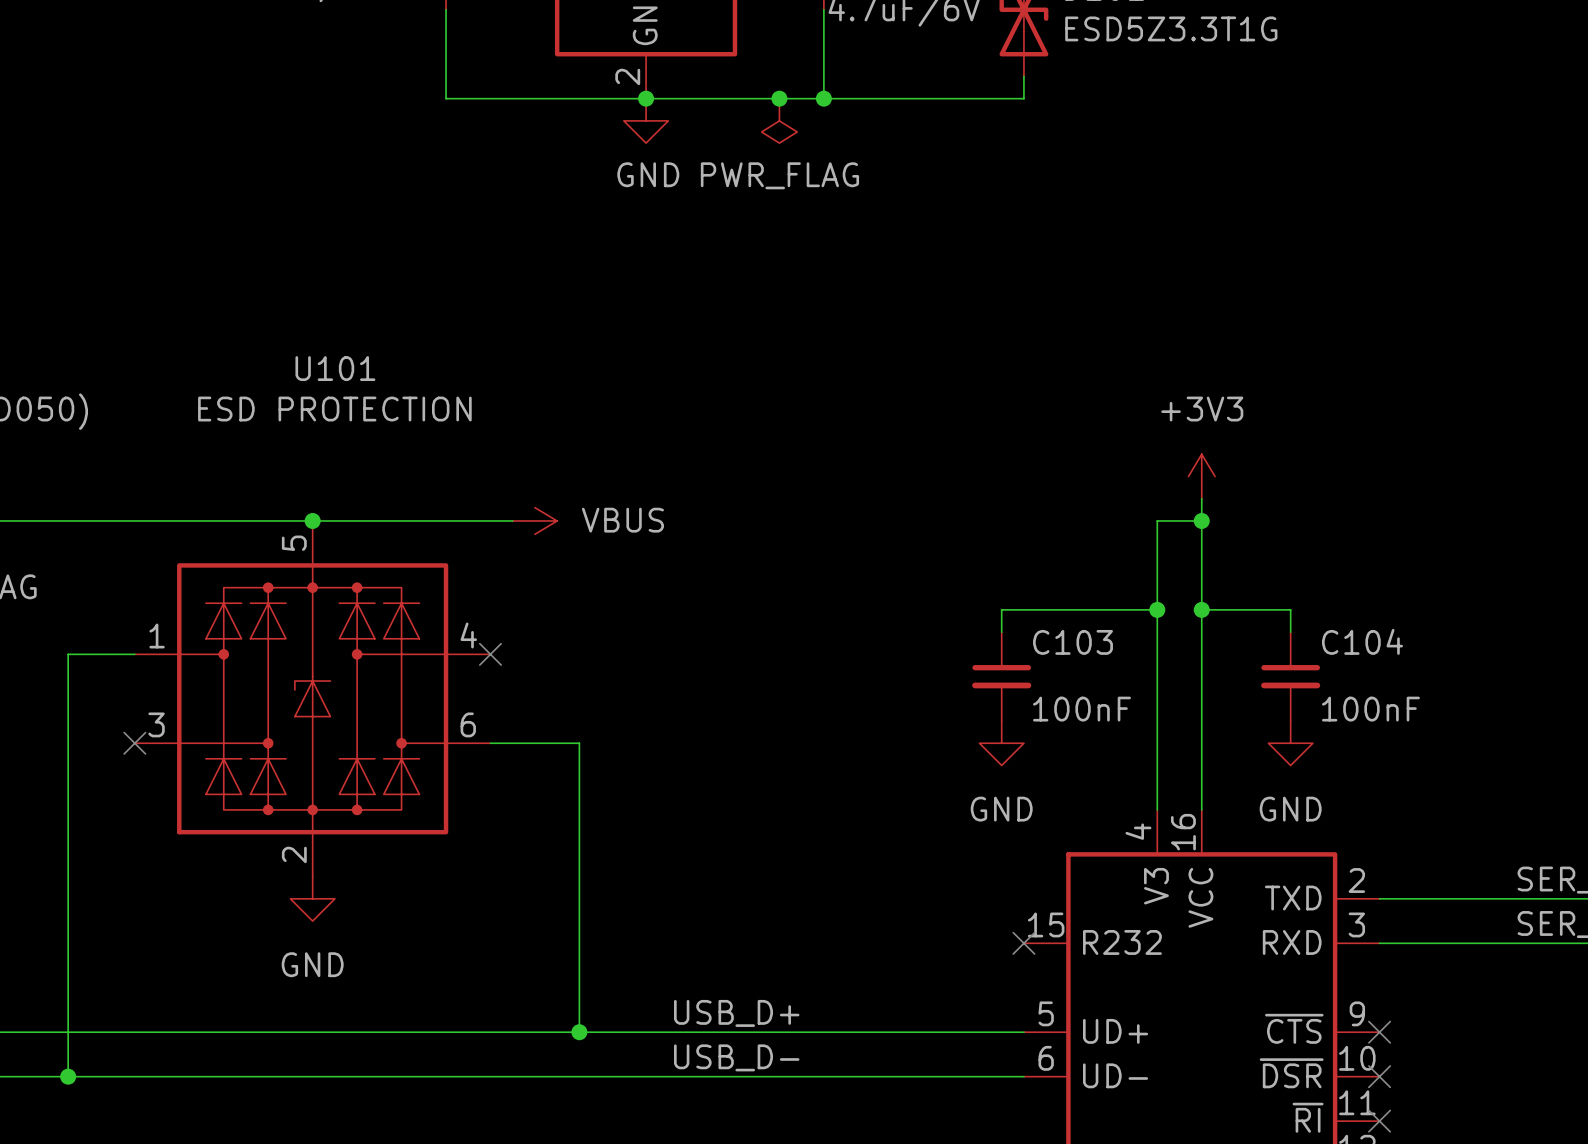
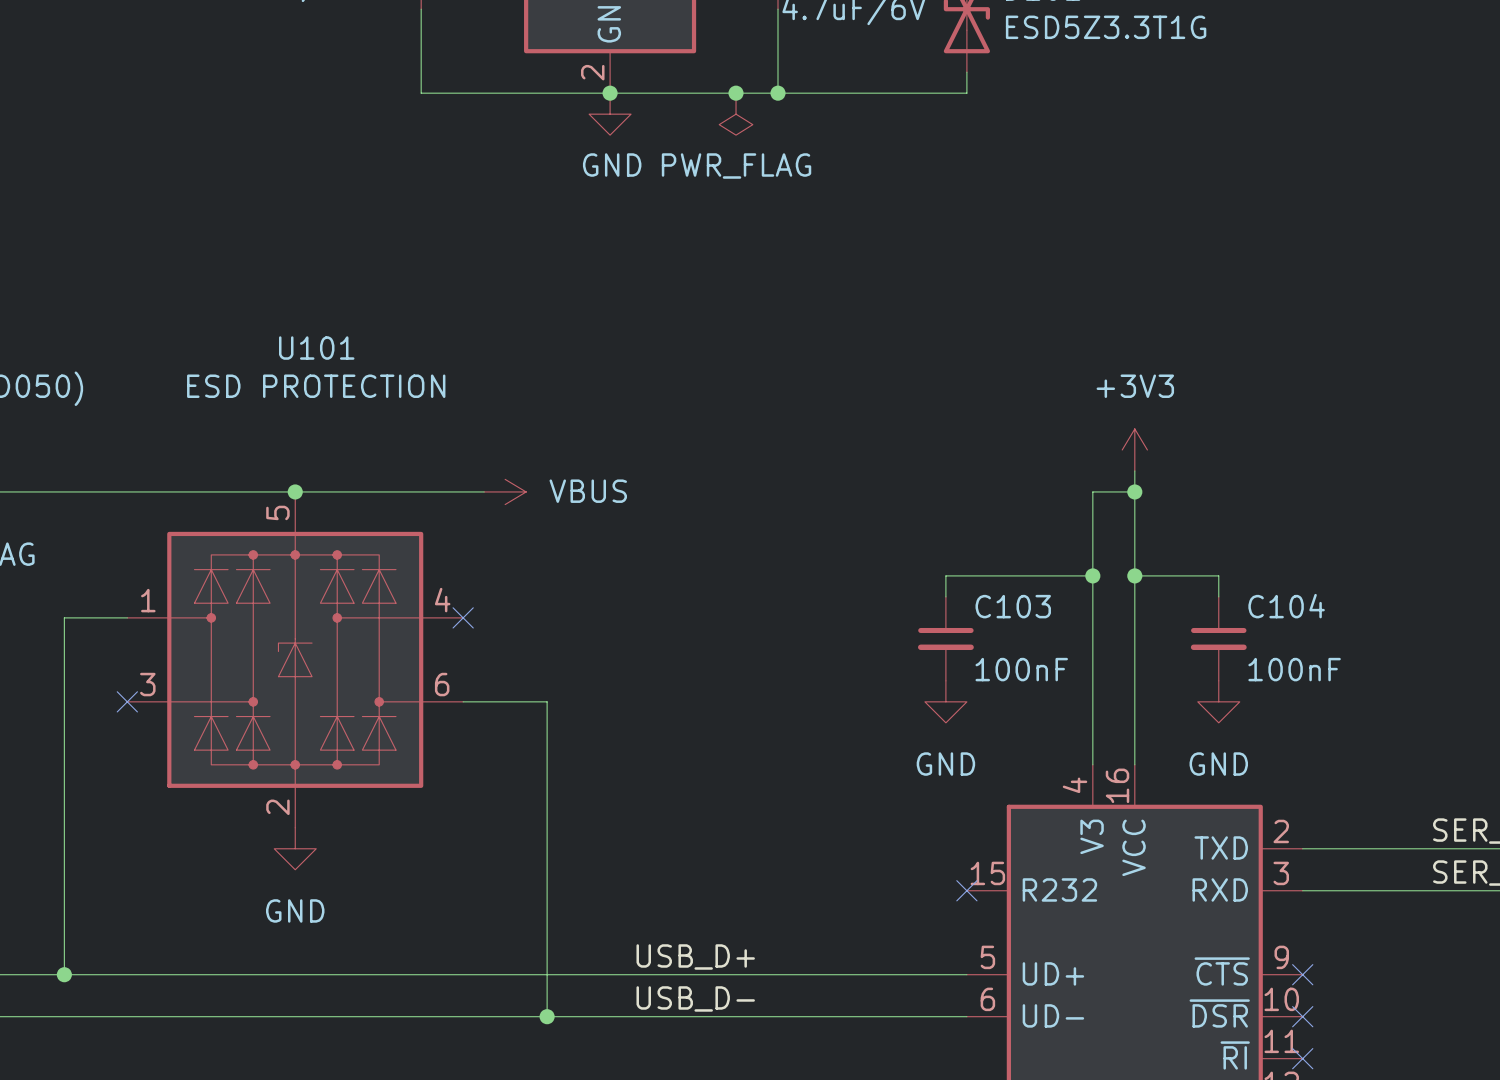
wire: (68, 1032) (68, 1076) -> none
wire: none -> (547, 974) (547, 1016)
junction position: (579, 1032) -> (547, 1016)
junction position: (68, 1076) -> (64, 974)

